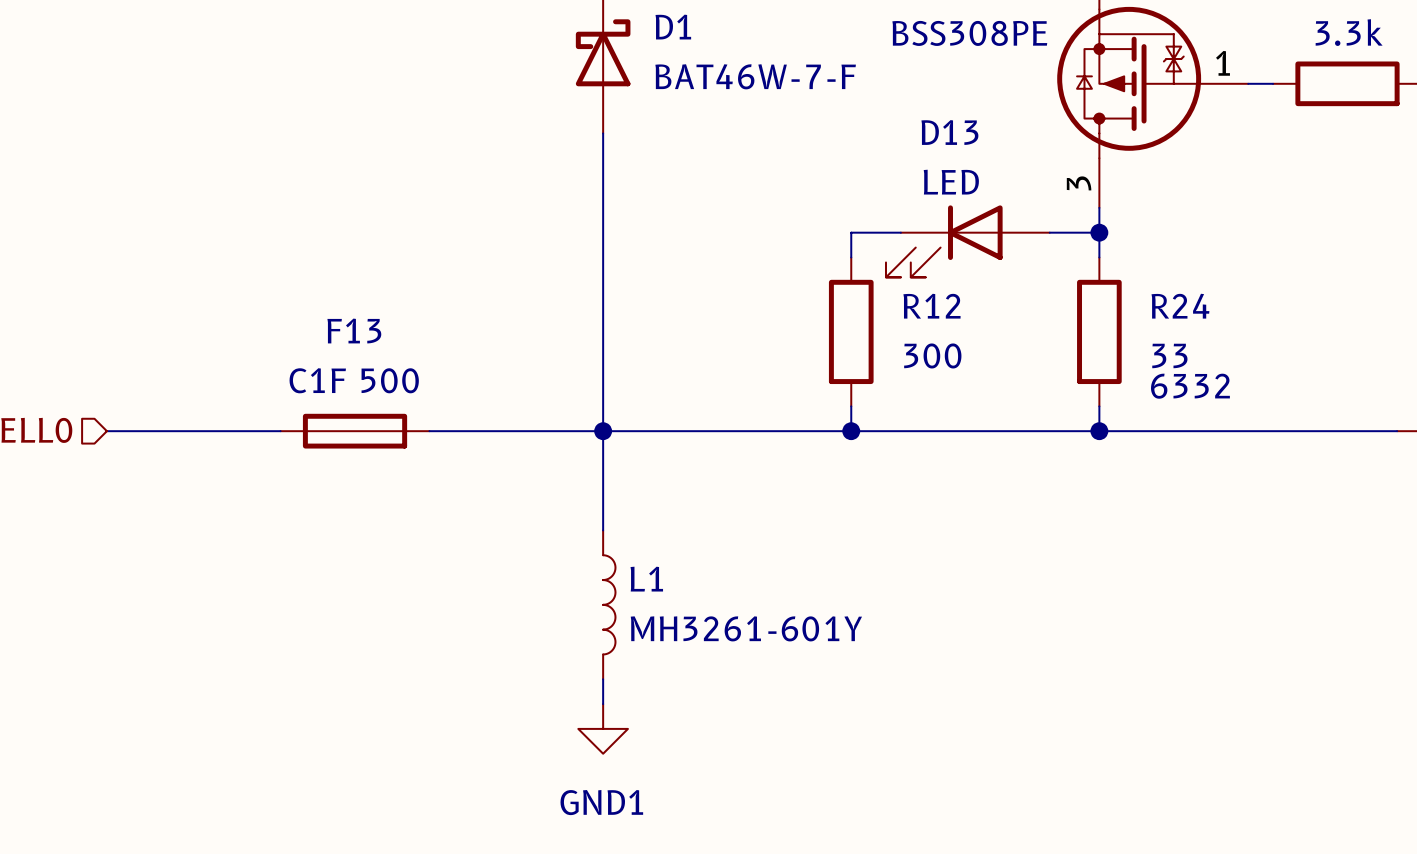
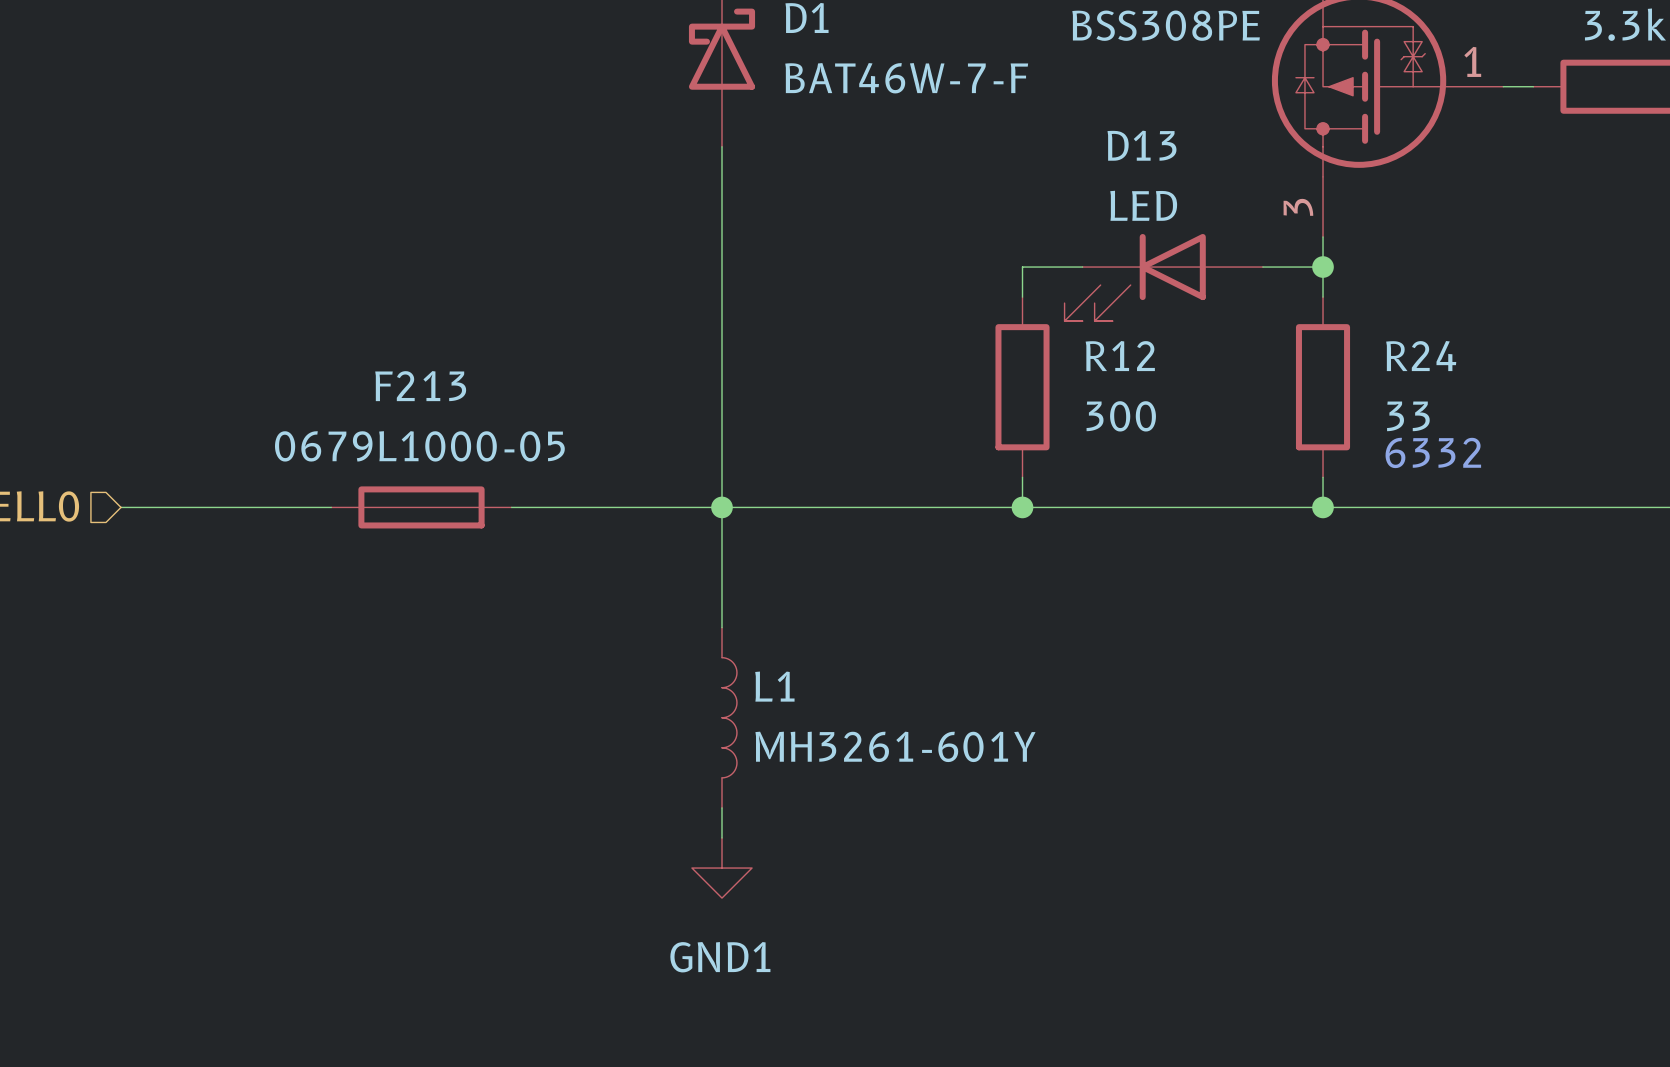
F13 name: F13 (354, 331) -> F213 (420, 386)
F13 value: C1F 500 (354, 380) -> 0679L1000-05 (419, 446)

